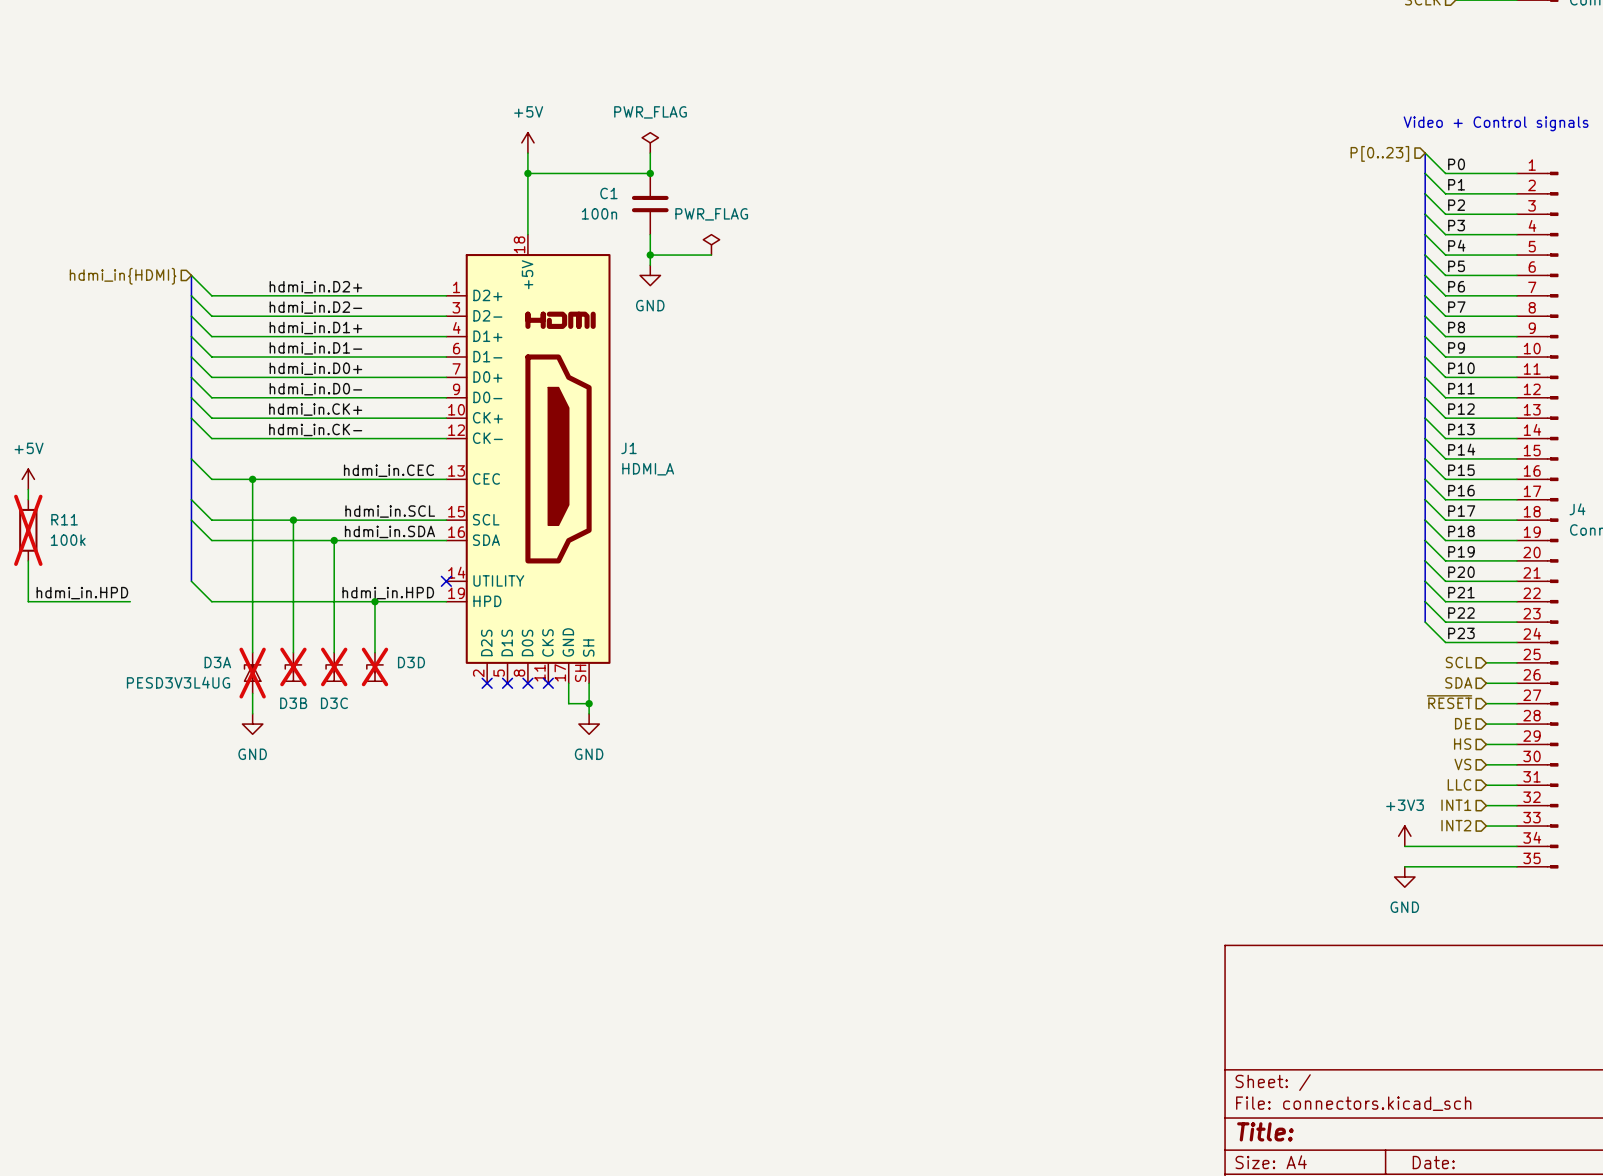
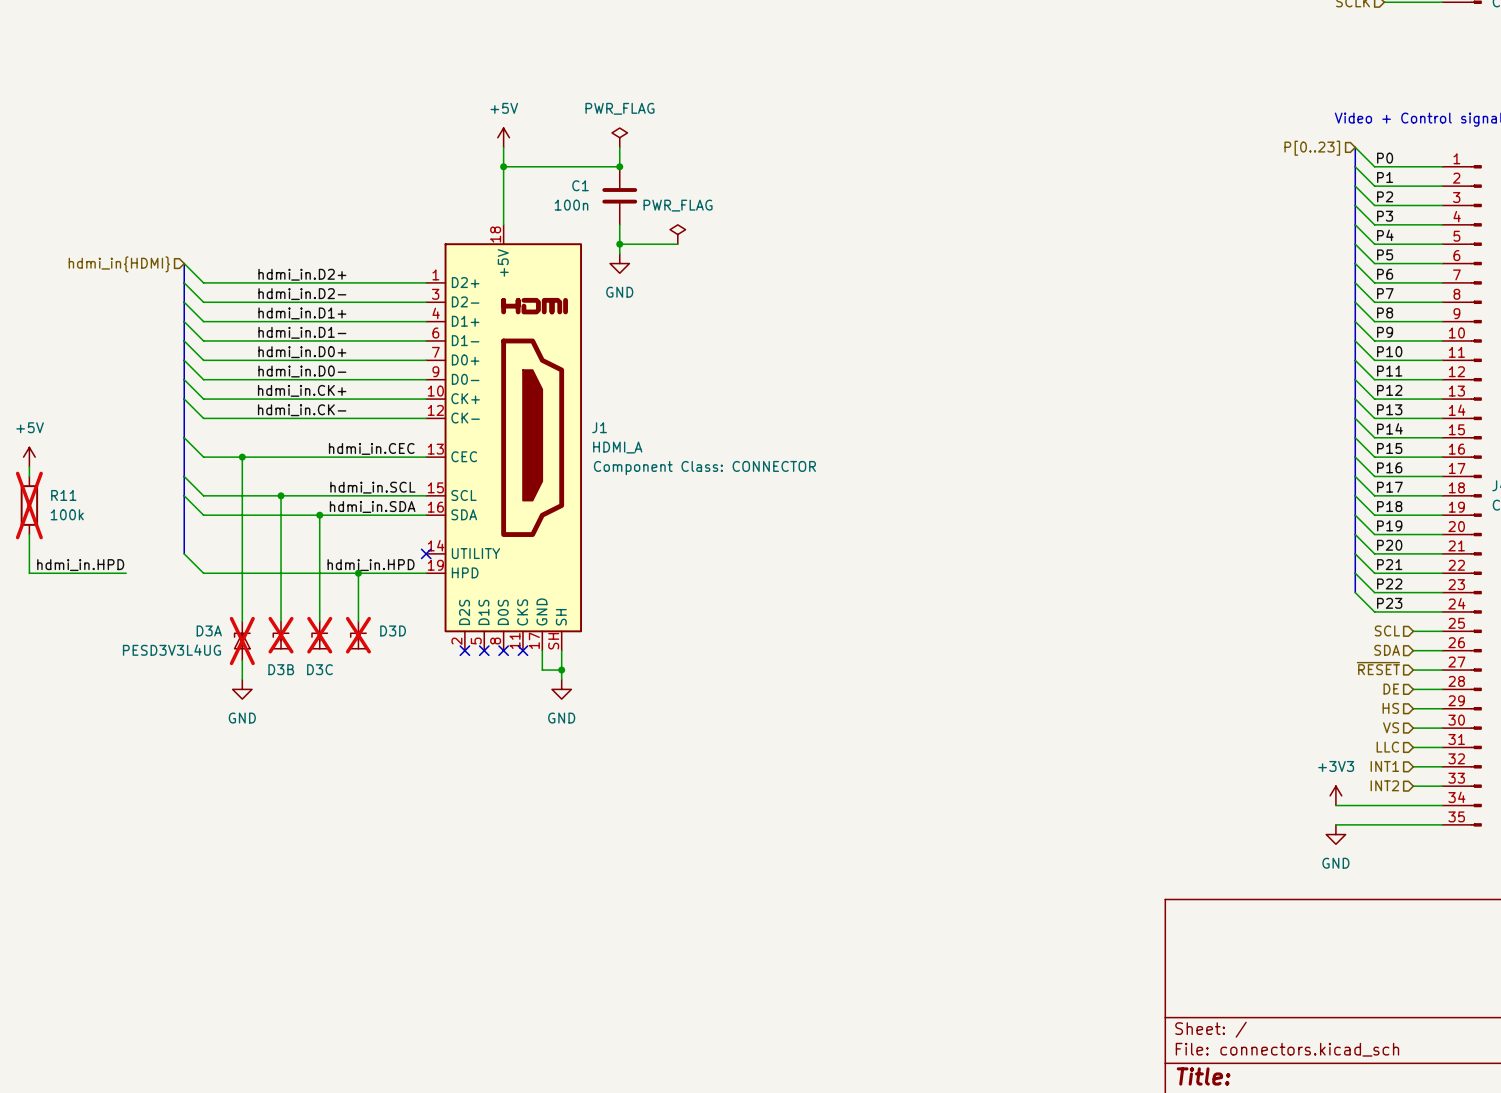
J1 text: none -> Component Class: CONNECTOR (704, 468)

